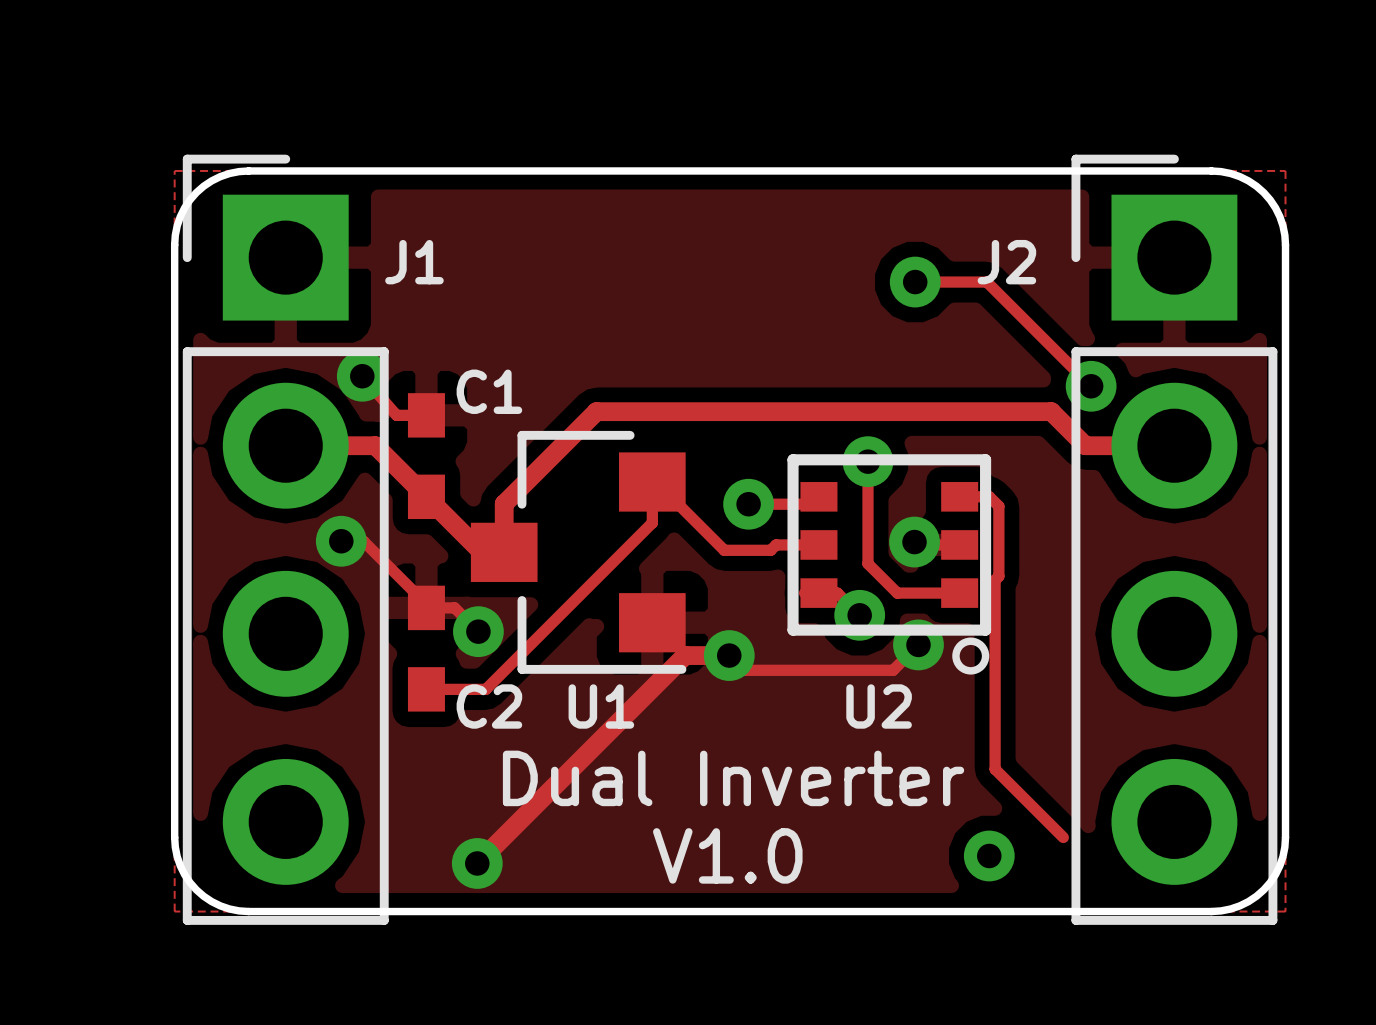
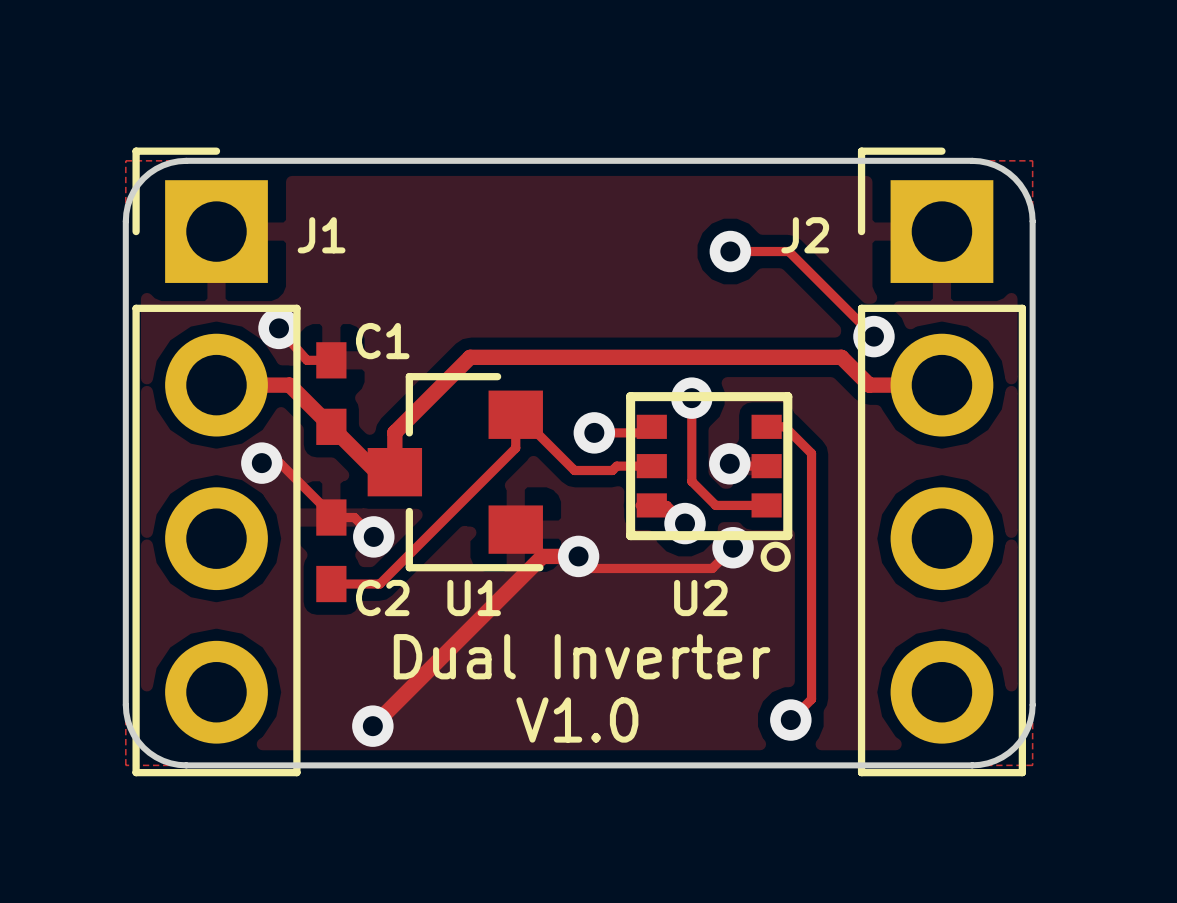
track: (982, 496) (989, 496) (998, 506) (998, 576) (995, 580) (995, 769) (1063, 837) -> (784, 426) (811, 453) (811, 699) (790, 720)

